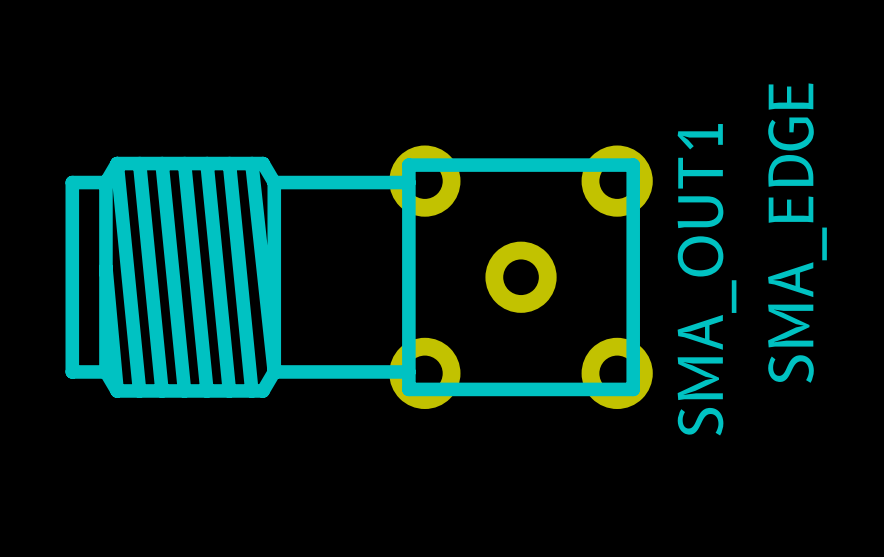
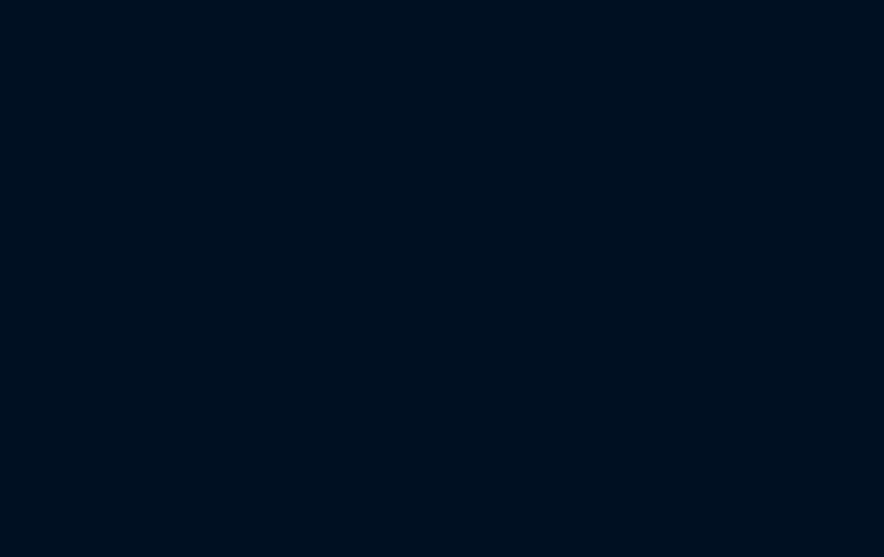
SMA_OUT1: SMA_EDGE (359, 277) -> none

